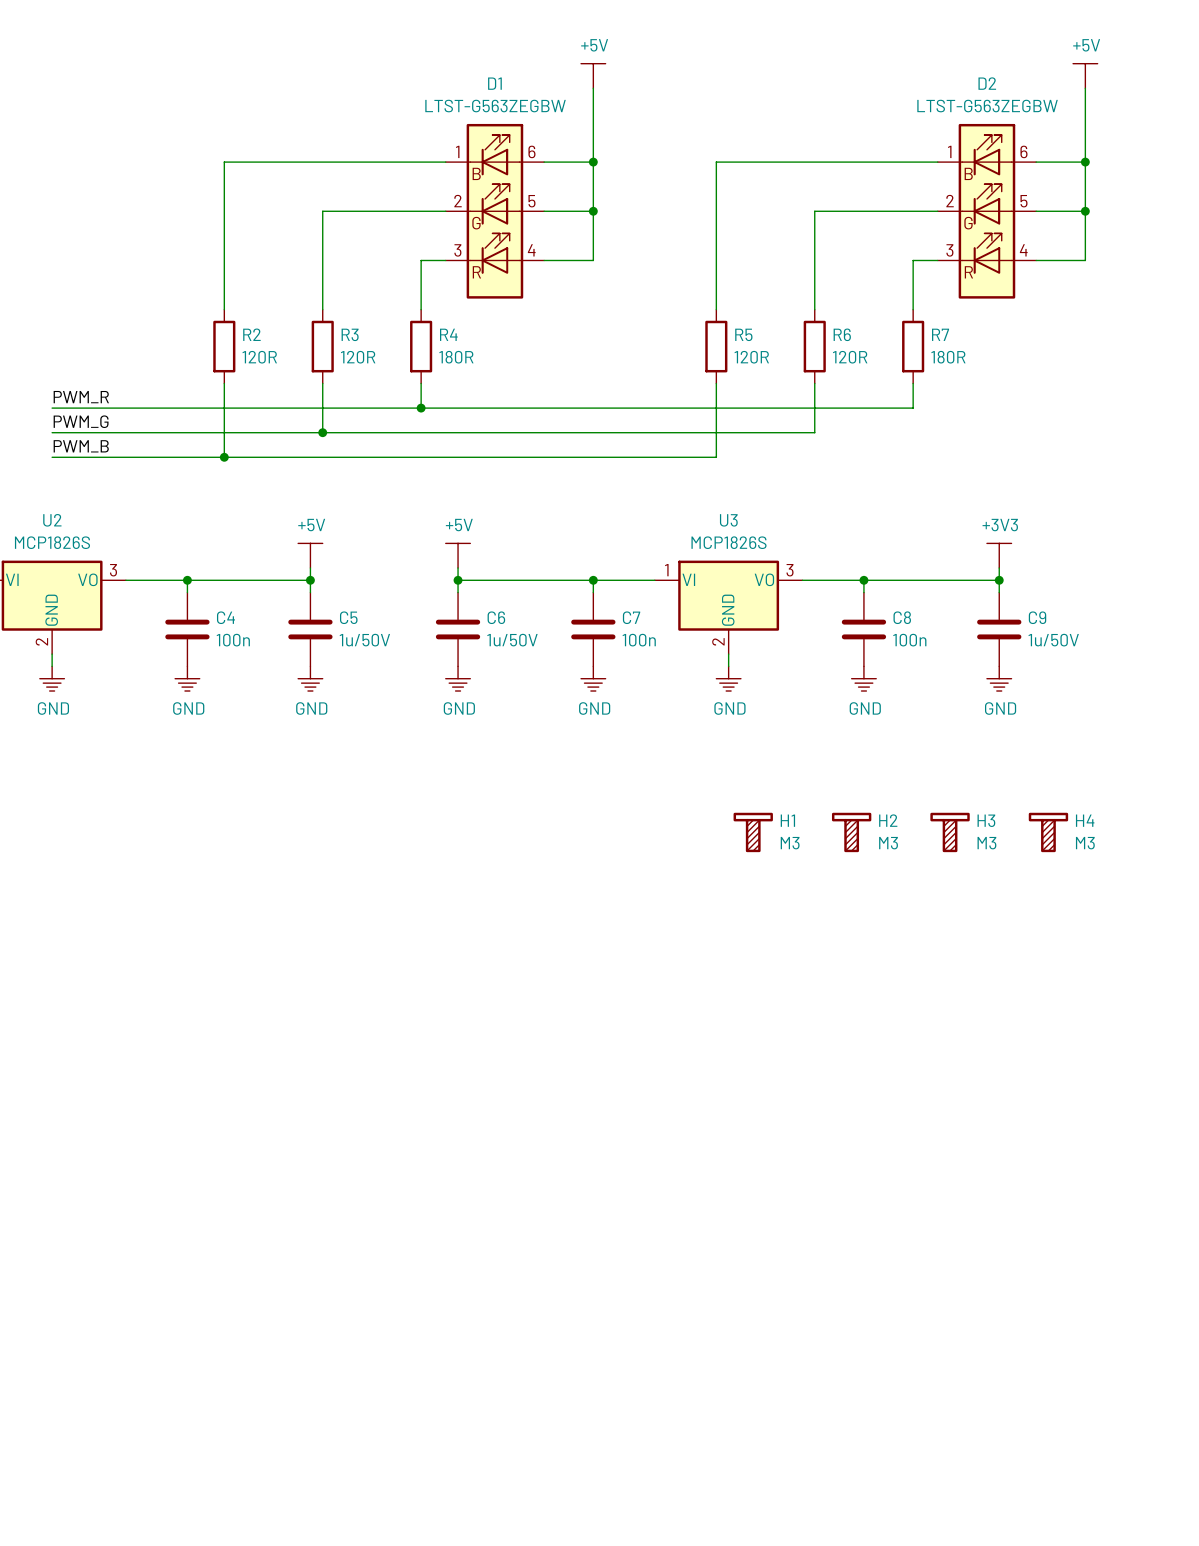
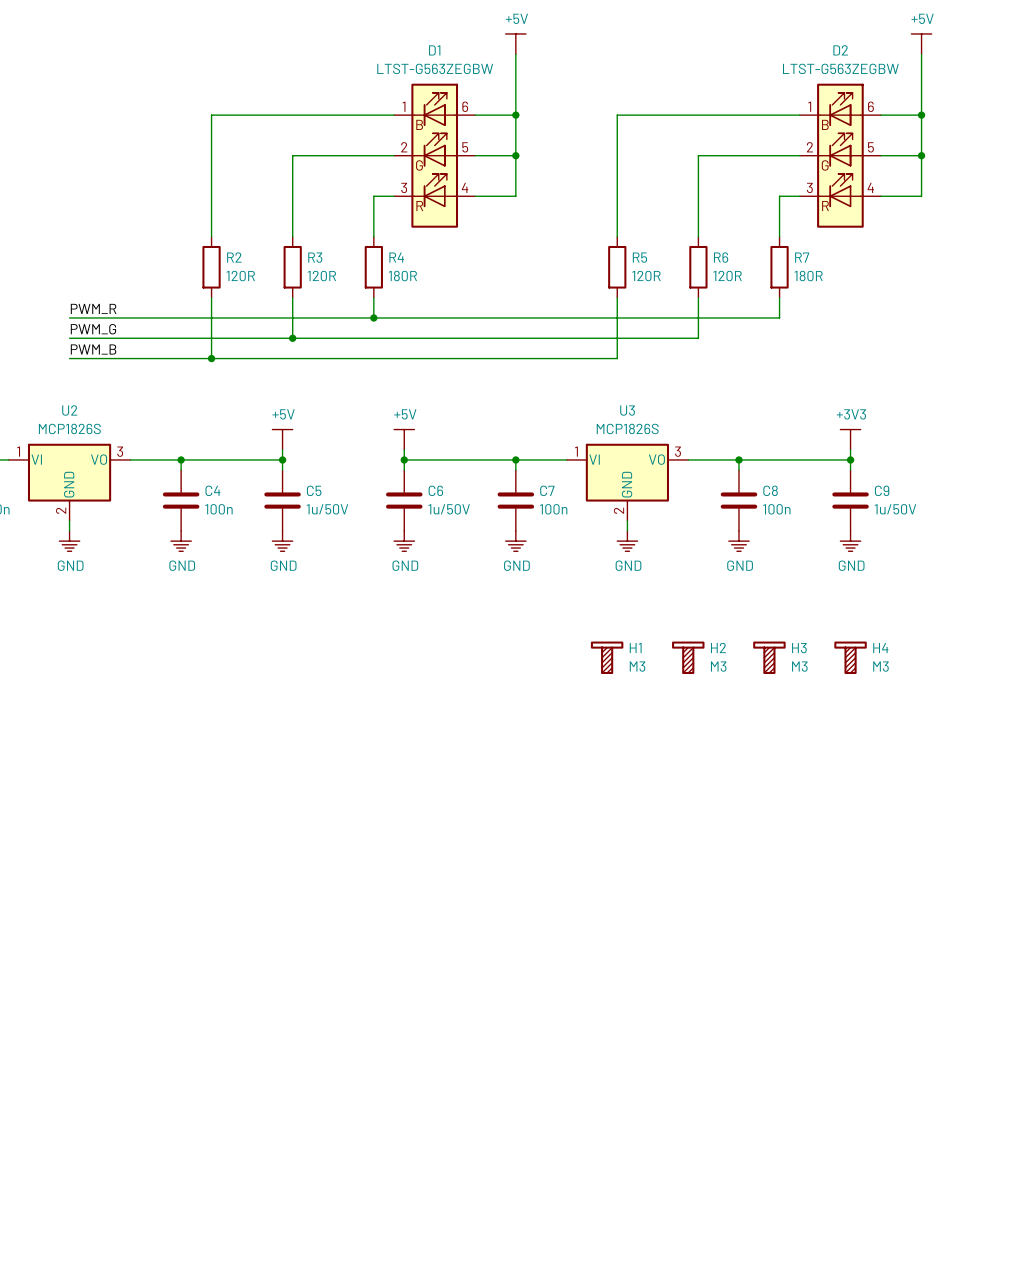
H1 position: (753, 832) -> (607, 657)
H2 position: (851, 832) -> (688, 657)
H3 position: (950, 832) -> (769, 657)
H4 position: (1048, 832) -> (850, 657)

